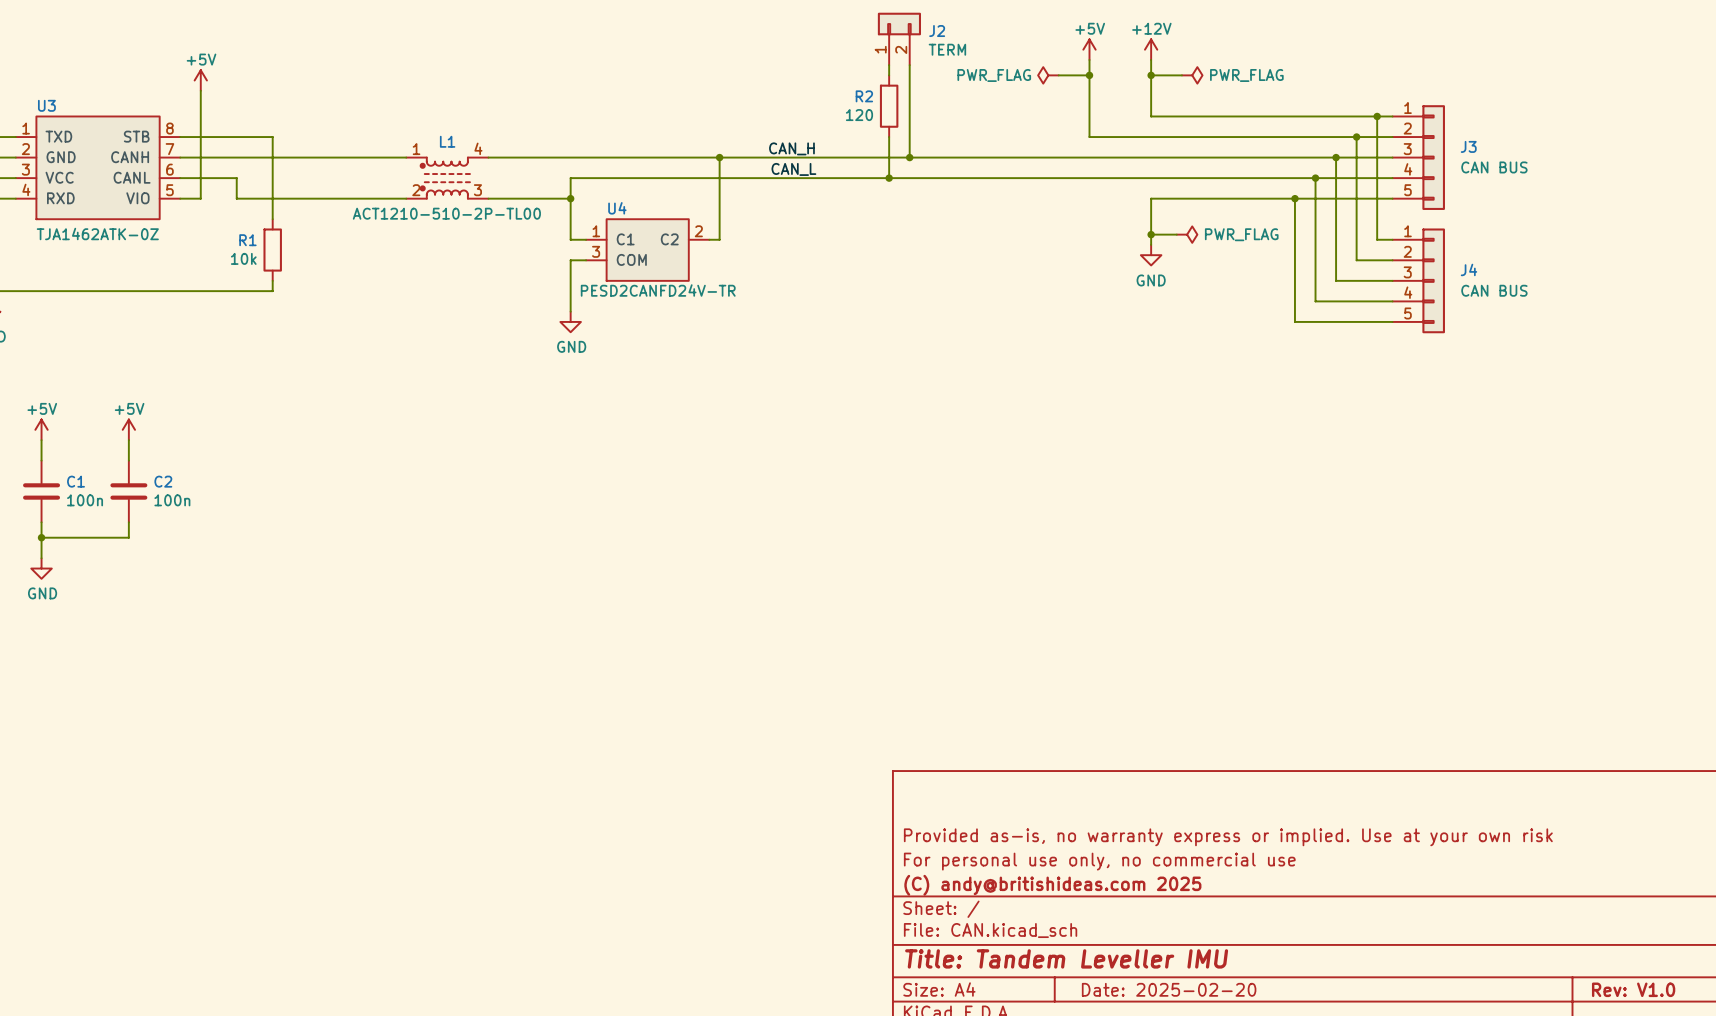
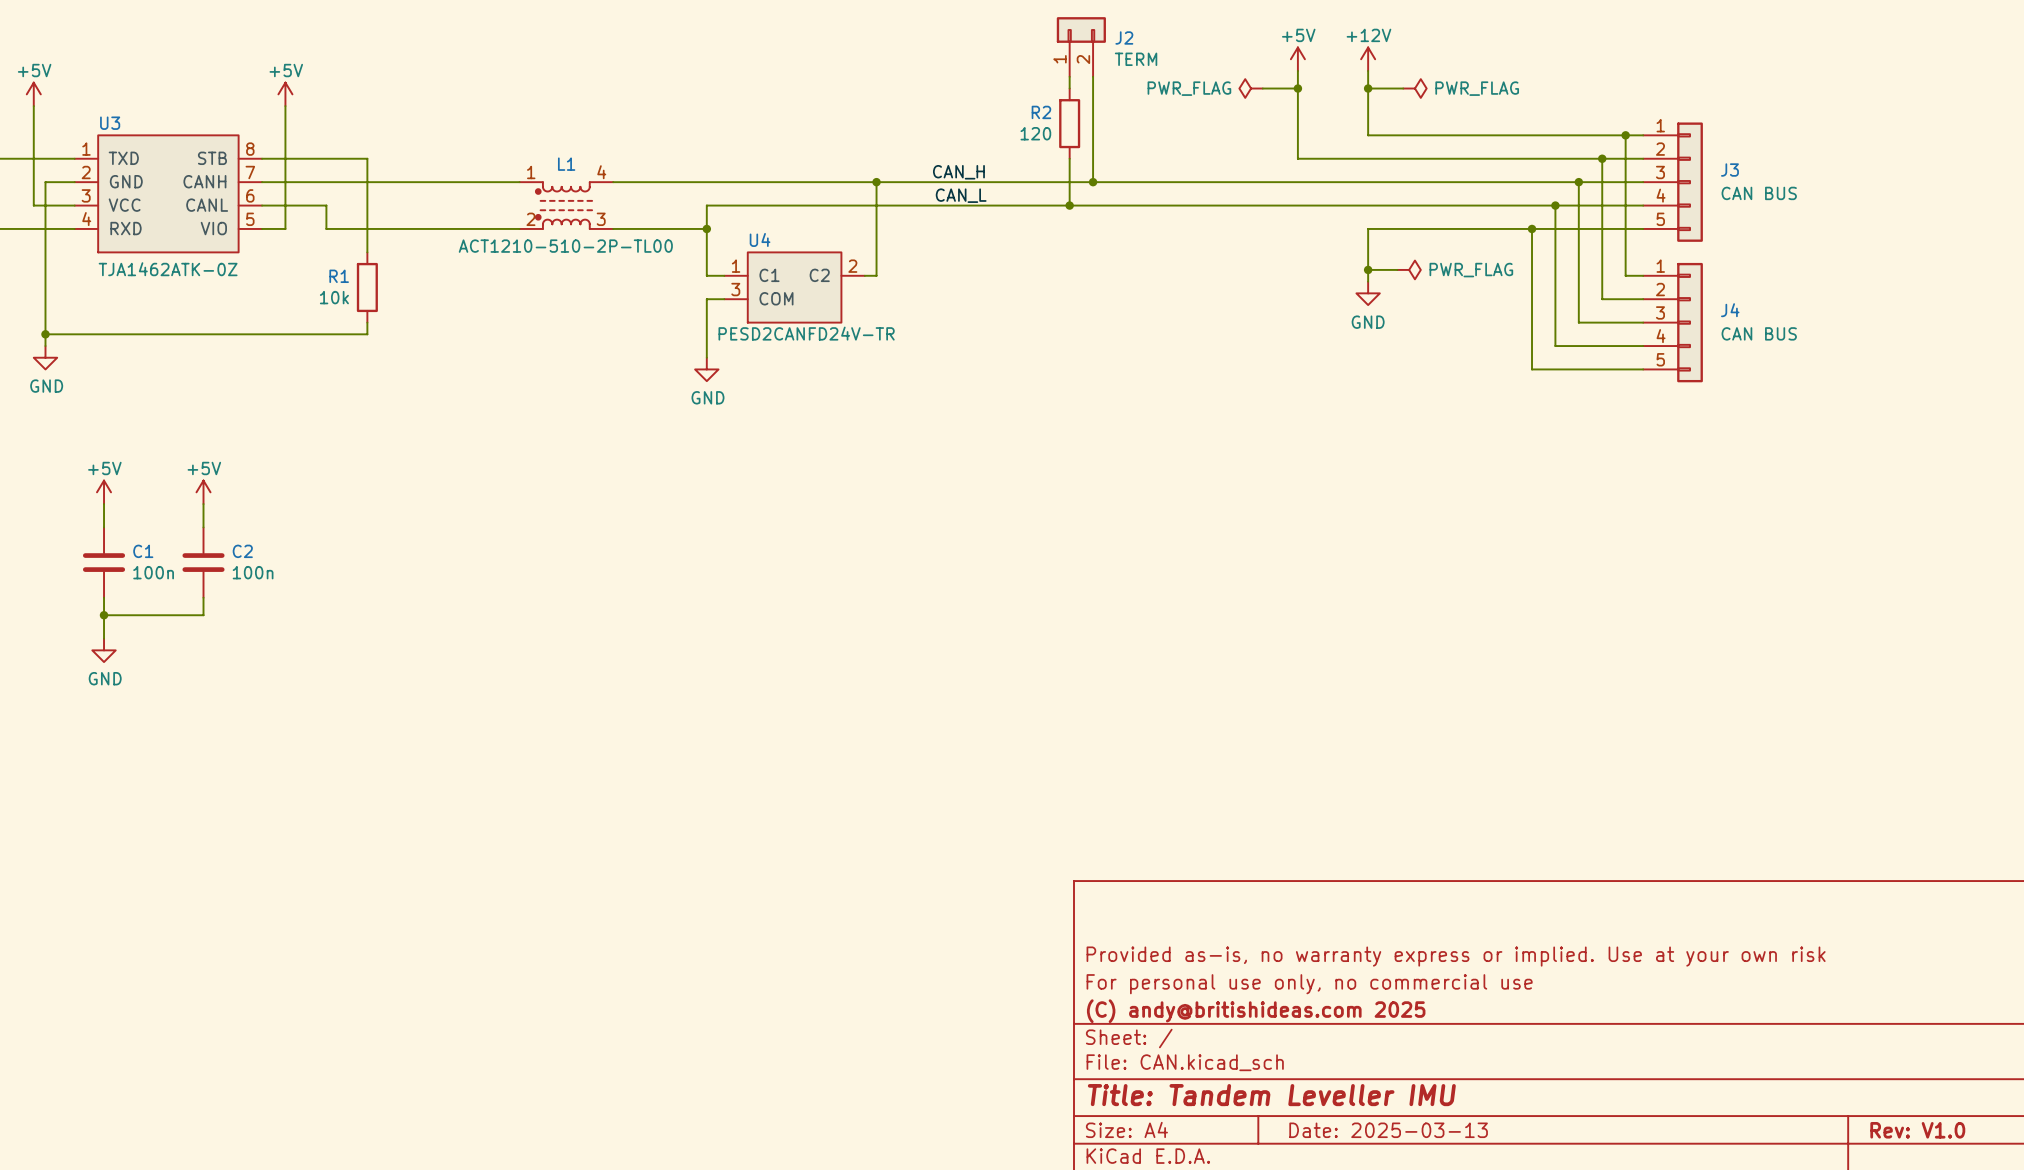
title block: Date: 2025-02-20 (1169, 989) -> Date: 2025-03-13 (1388, 1130)

